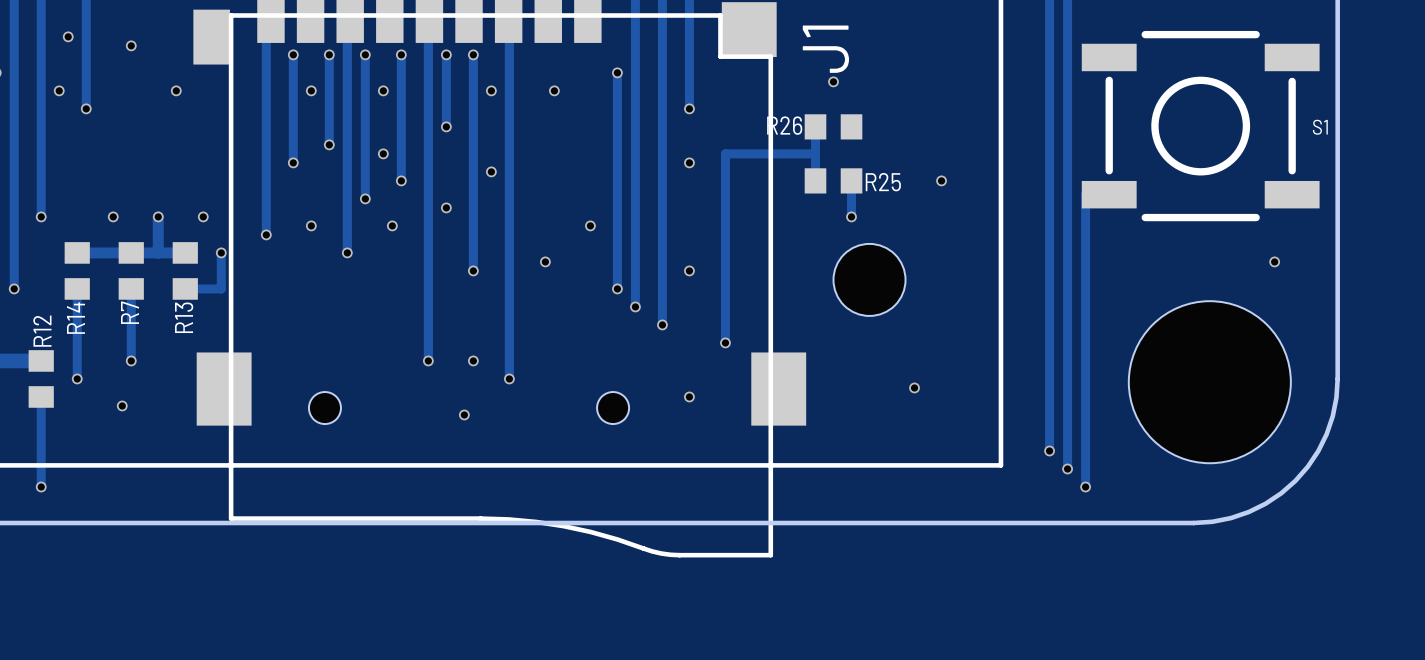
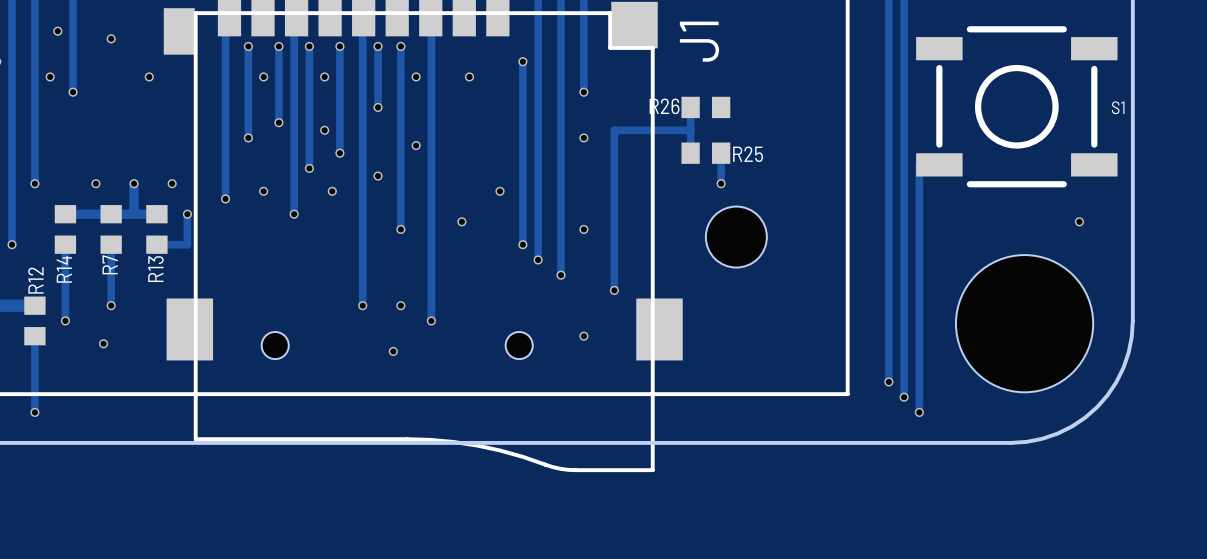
via: (833, 81) -> none
via: (941, 180) -> none
via: (914, 387) -> none

